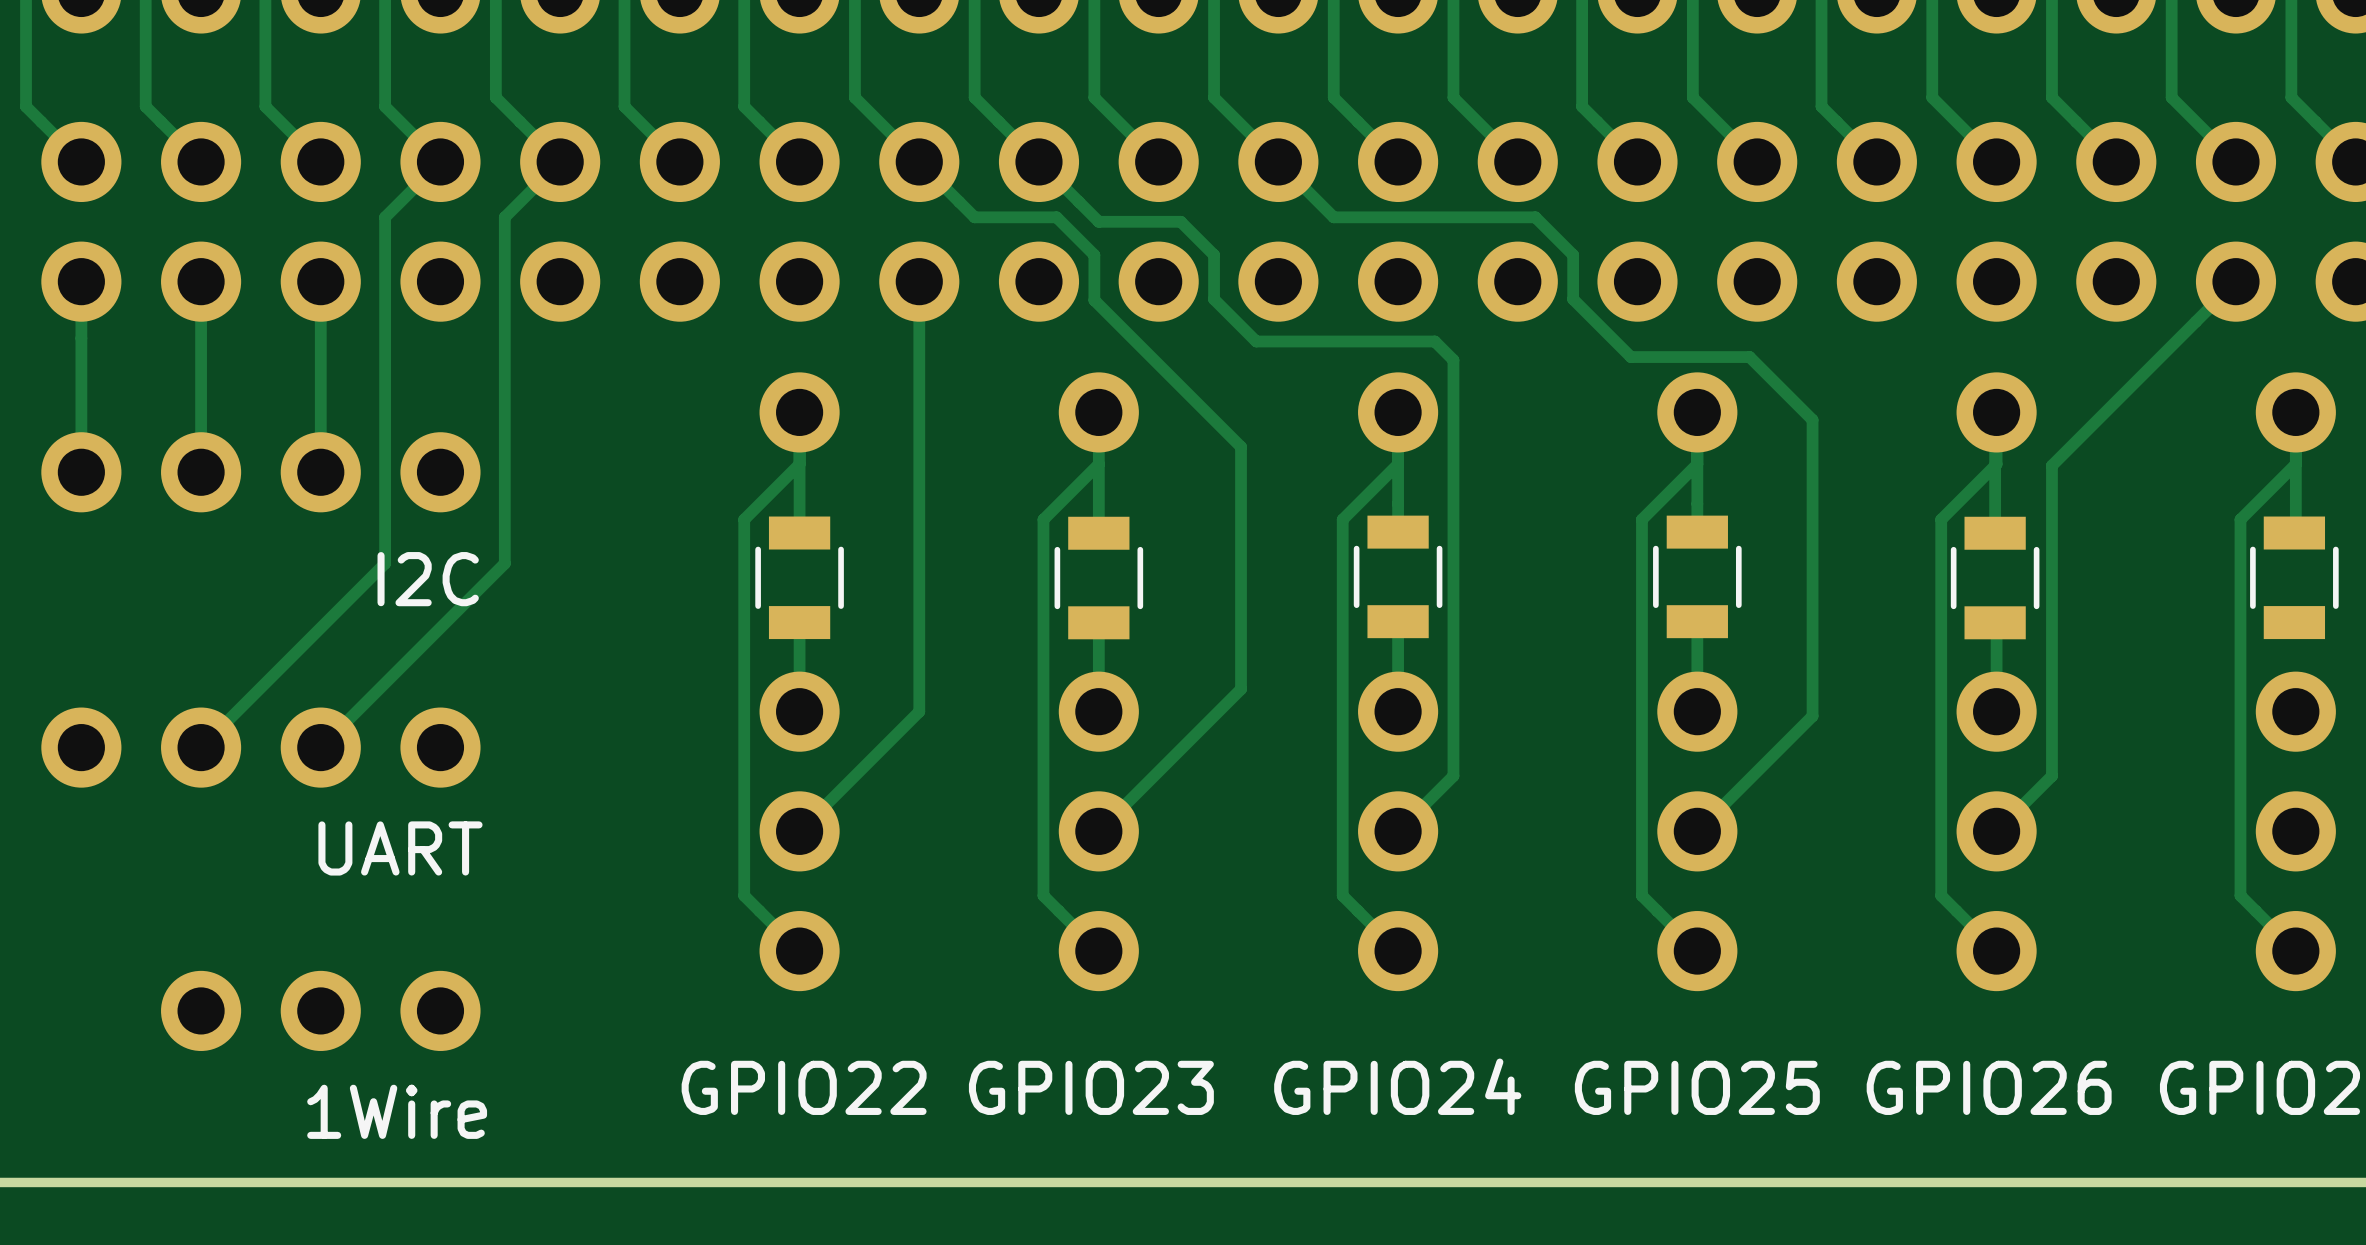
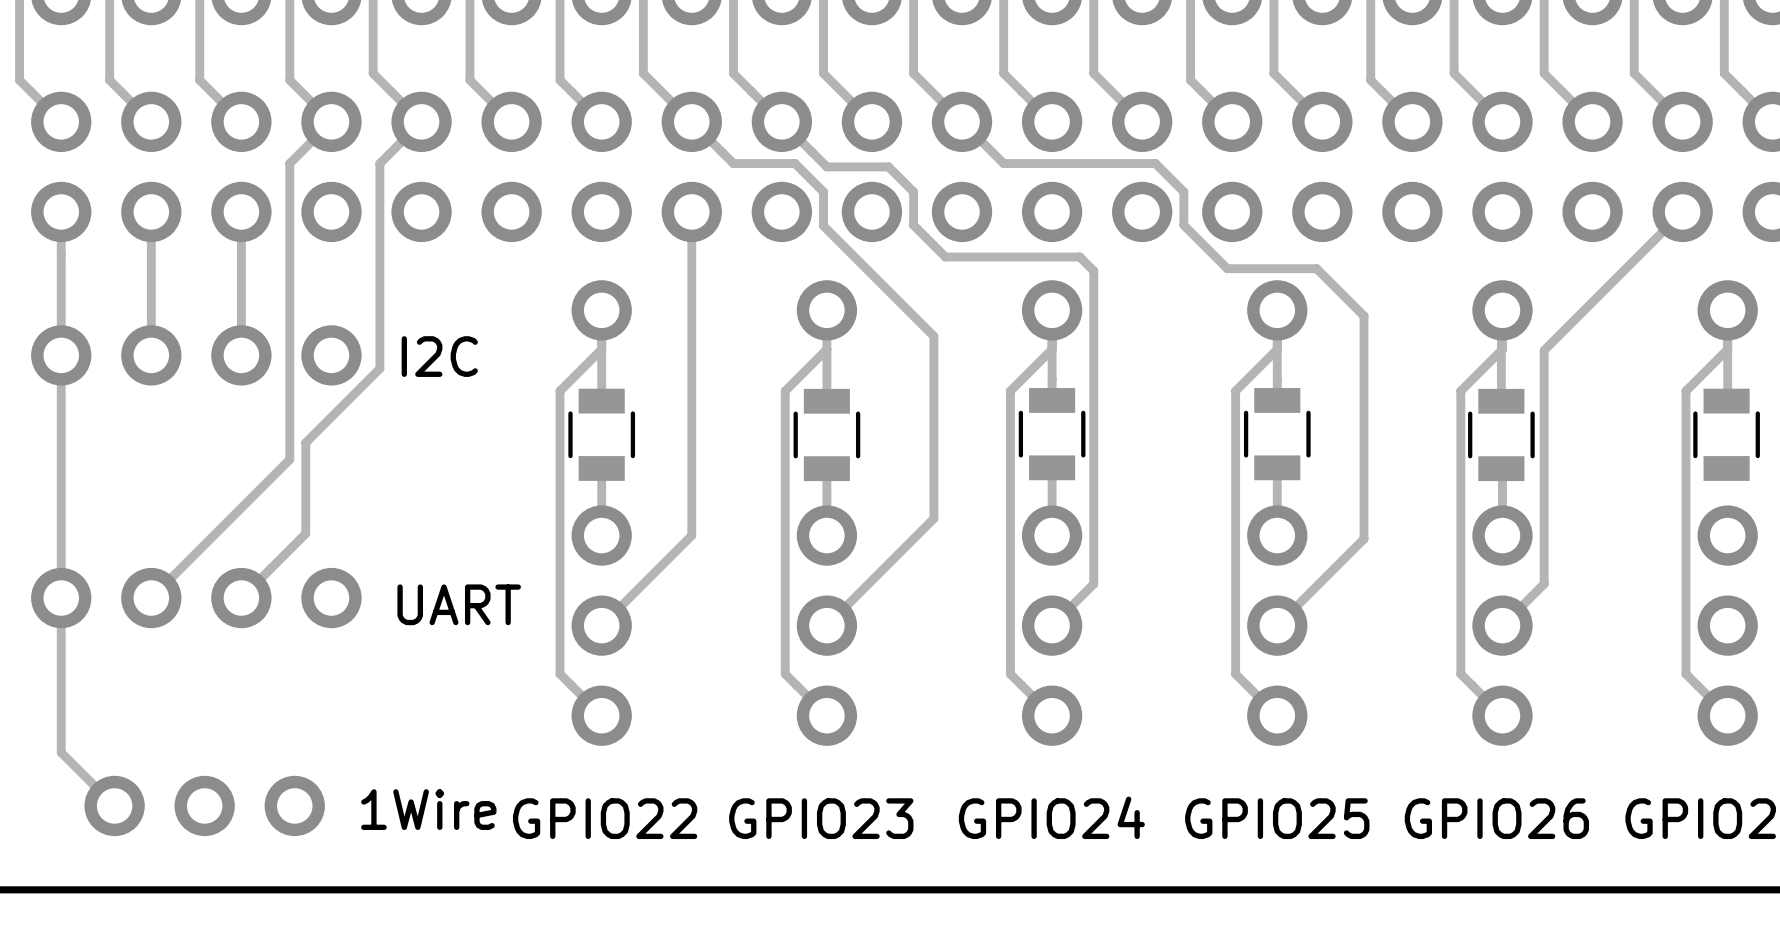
track: (385, 217) (385, 563) (201, 747) -> (289, 163) (289, 459) (151, 598)
track: none -> (61, 355) (61, 752) (114, 805)
track: (504, 489) (504, 563) (320, 747) -> (379, 368) (305, 442) (305, 533) (241, 598)
I2C name position: I2C (428, 579) -> I2C (439, 356)
UART position: (260, 747) -> (196, 598)
UART name position: UART (400, 848) -> UART (459, 604)
1Wire position: (320, 1010) -> (204, 805)
1Wire name position: 1Wire (397, 1111) -> 1Wire (428, 809)

